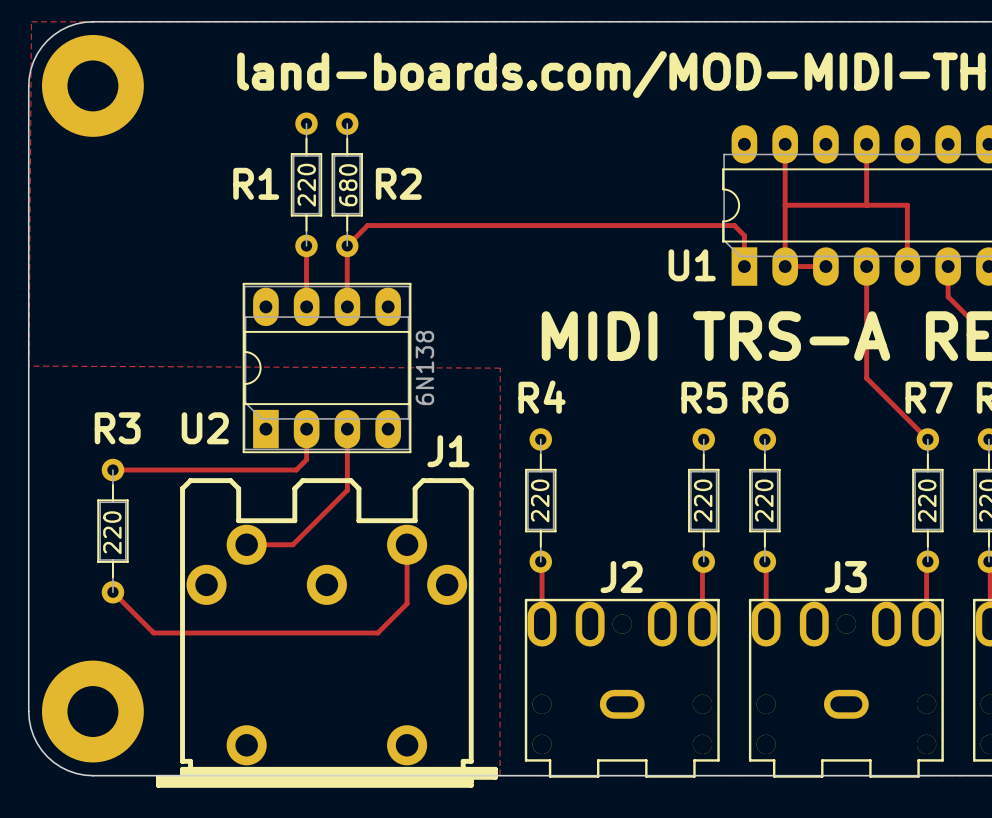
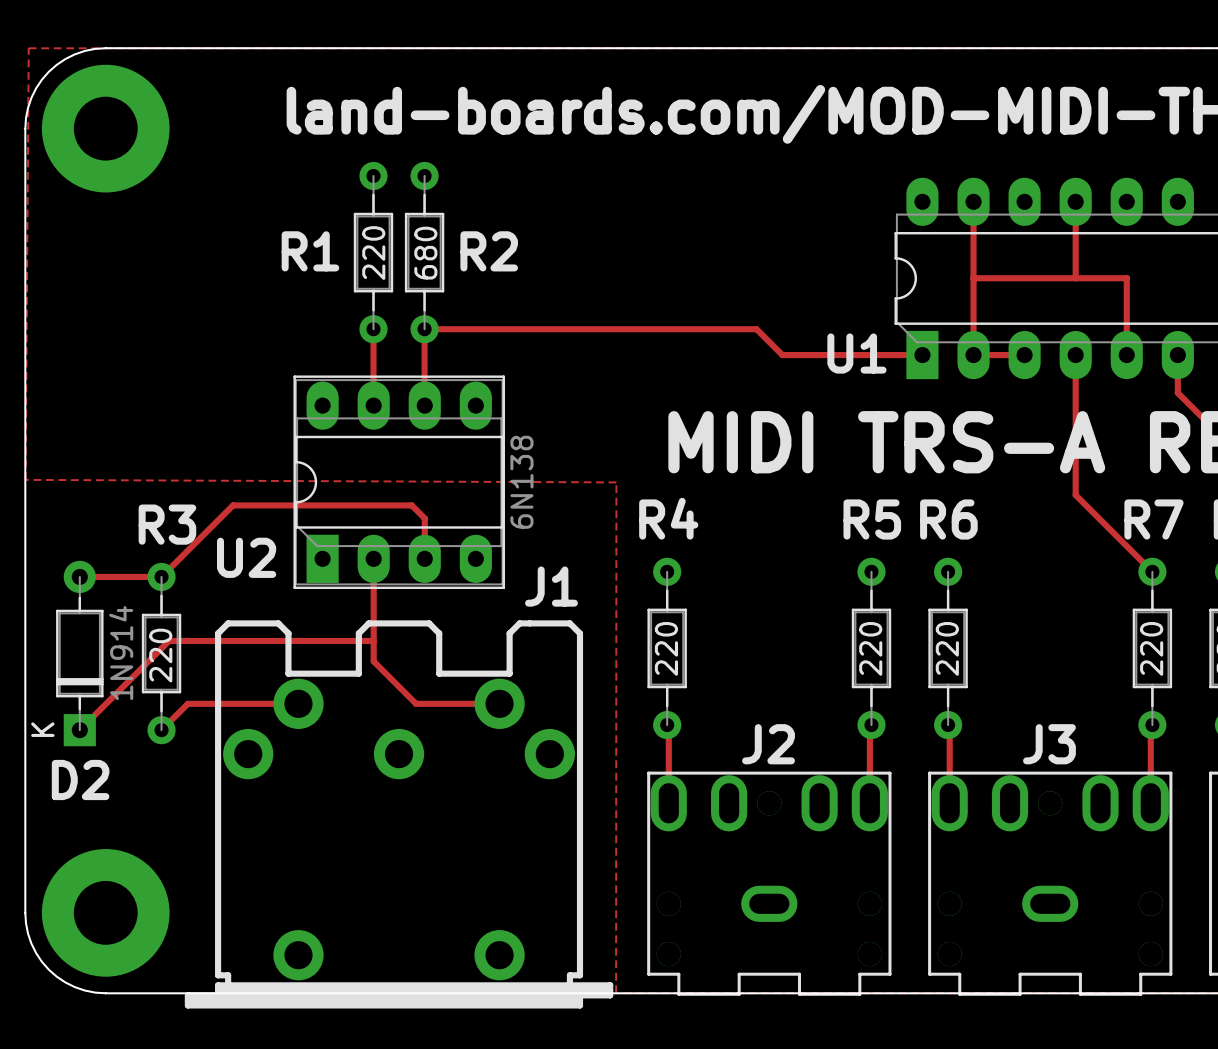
track: (347, 245) (367, 225) (734, 225) (744, 235) (744, 266) -> (424, 329) (756, 329) (782, 355) (922, 355)
track: (347, 429) (347, 490) (292, 544) (246, 544) -> (424, 558) (424, 518) (411, 505) (233, 505) (161, 576) (79, 576)
track: (306, 459) (296, 470) (112, 470) -> none
track: none -> (373, 640) (168, 640) (79, 730)
D2: none -> 1N914 (79, 653)
R3 position: (112, 531) -> (161, 653)
track: none -> (298, 703) (187, 703) (161, 730)
track: (407, 544) (407, 603) (377, 633) (153, 633) (112, 592) -> (499, 703) (416, 703) (373, 661) (373, 597)

